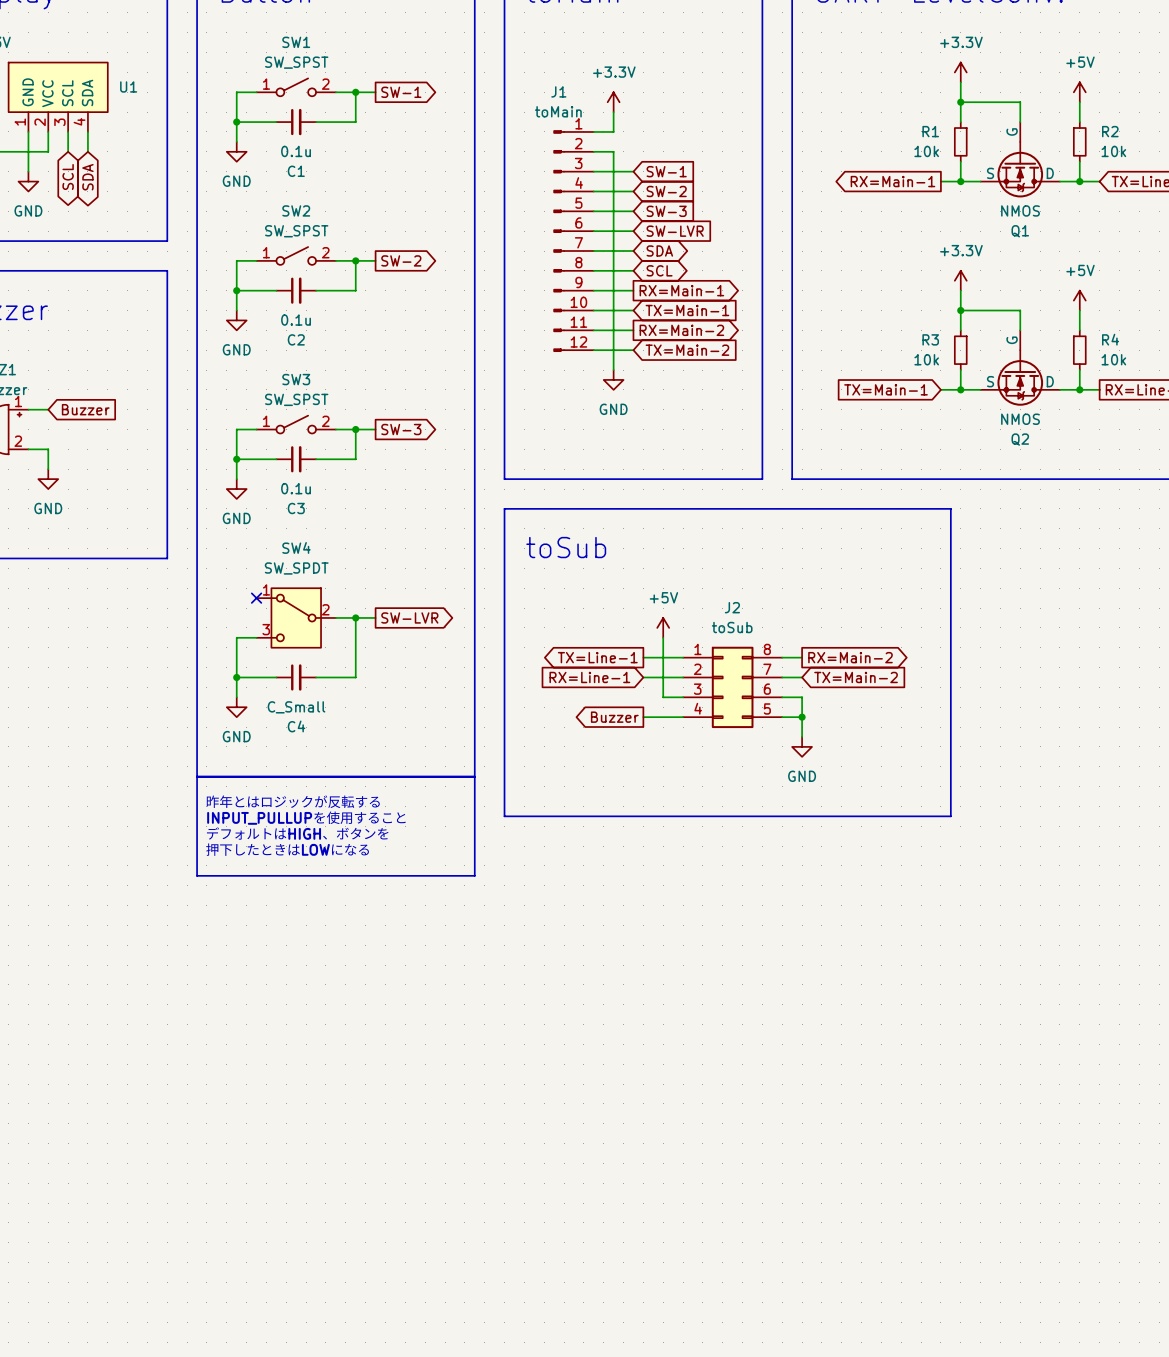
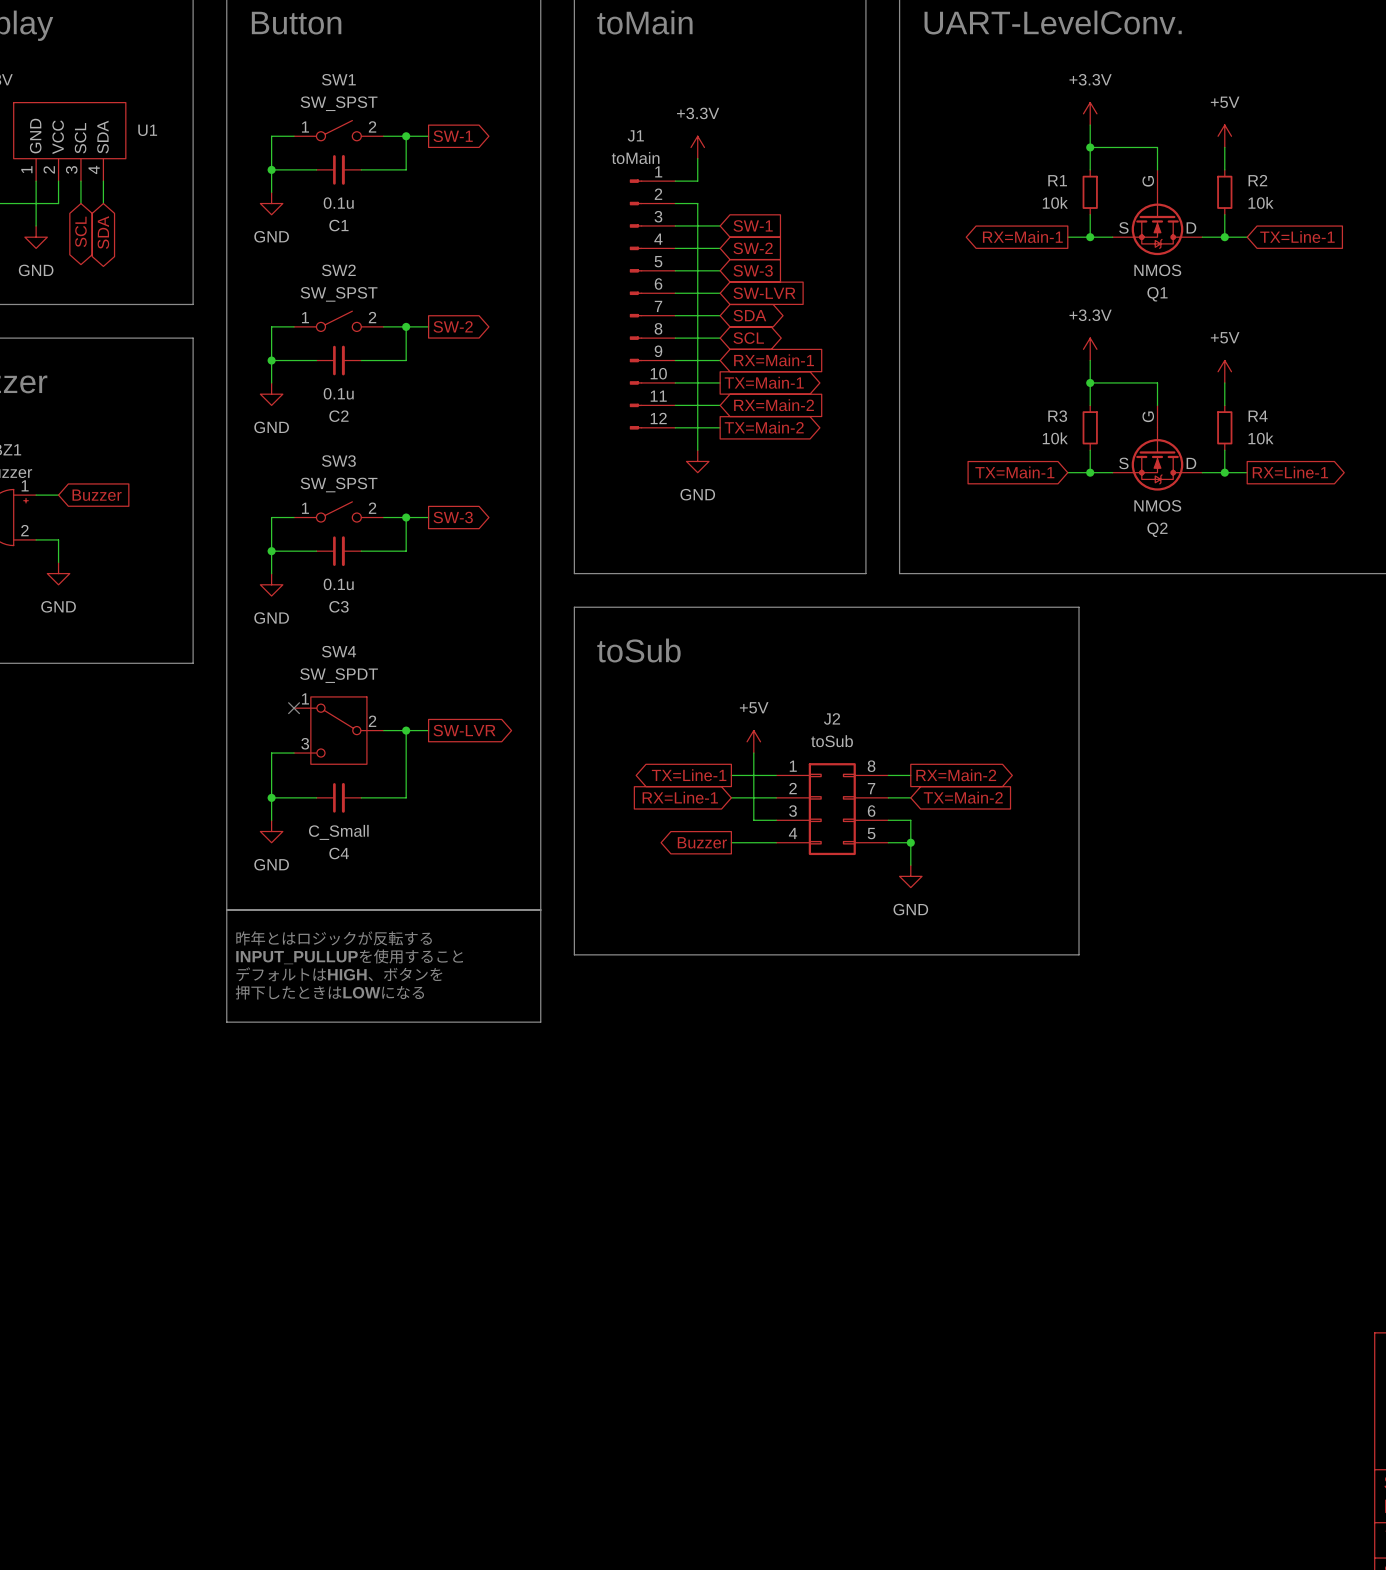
global label shape: output (681, 290) -> input (774, 360)
global label shape: input (687, 310) -> output (764, 382)
global label shape: output (681, 330) -> input (774, 405)
global label shape: input (687, 350) -> output (764, 427)

